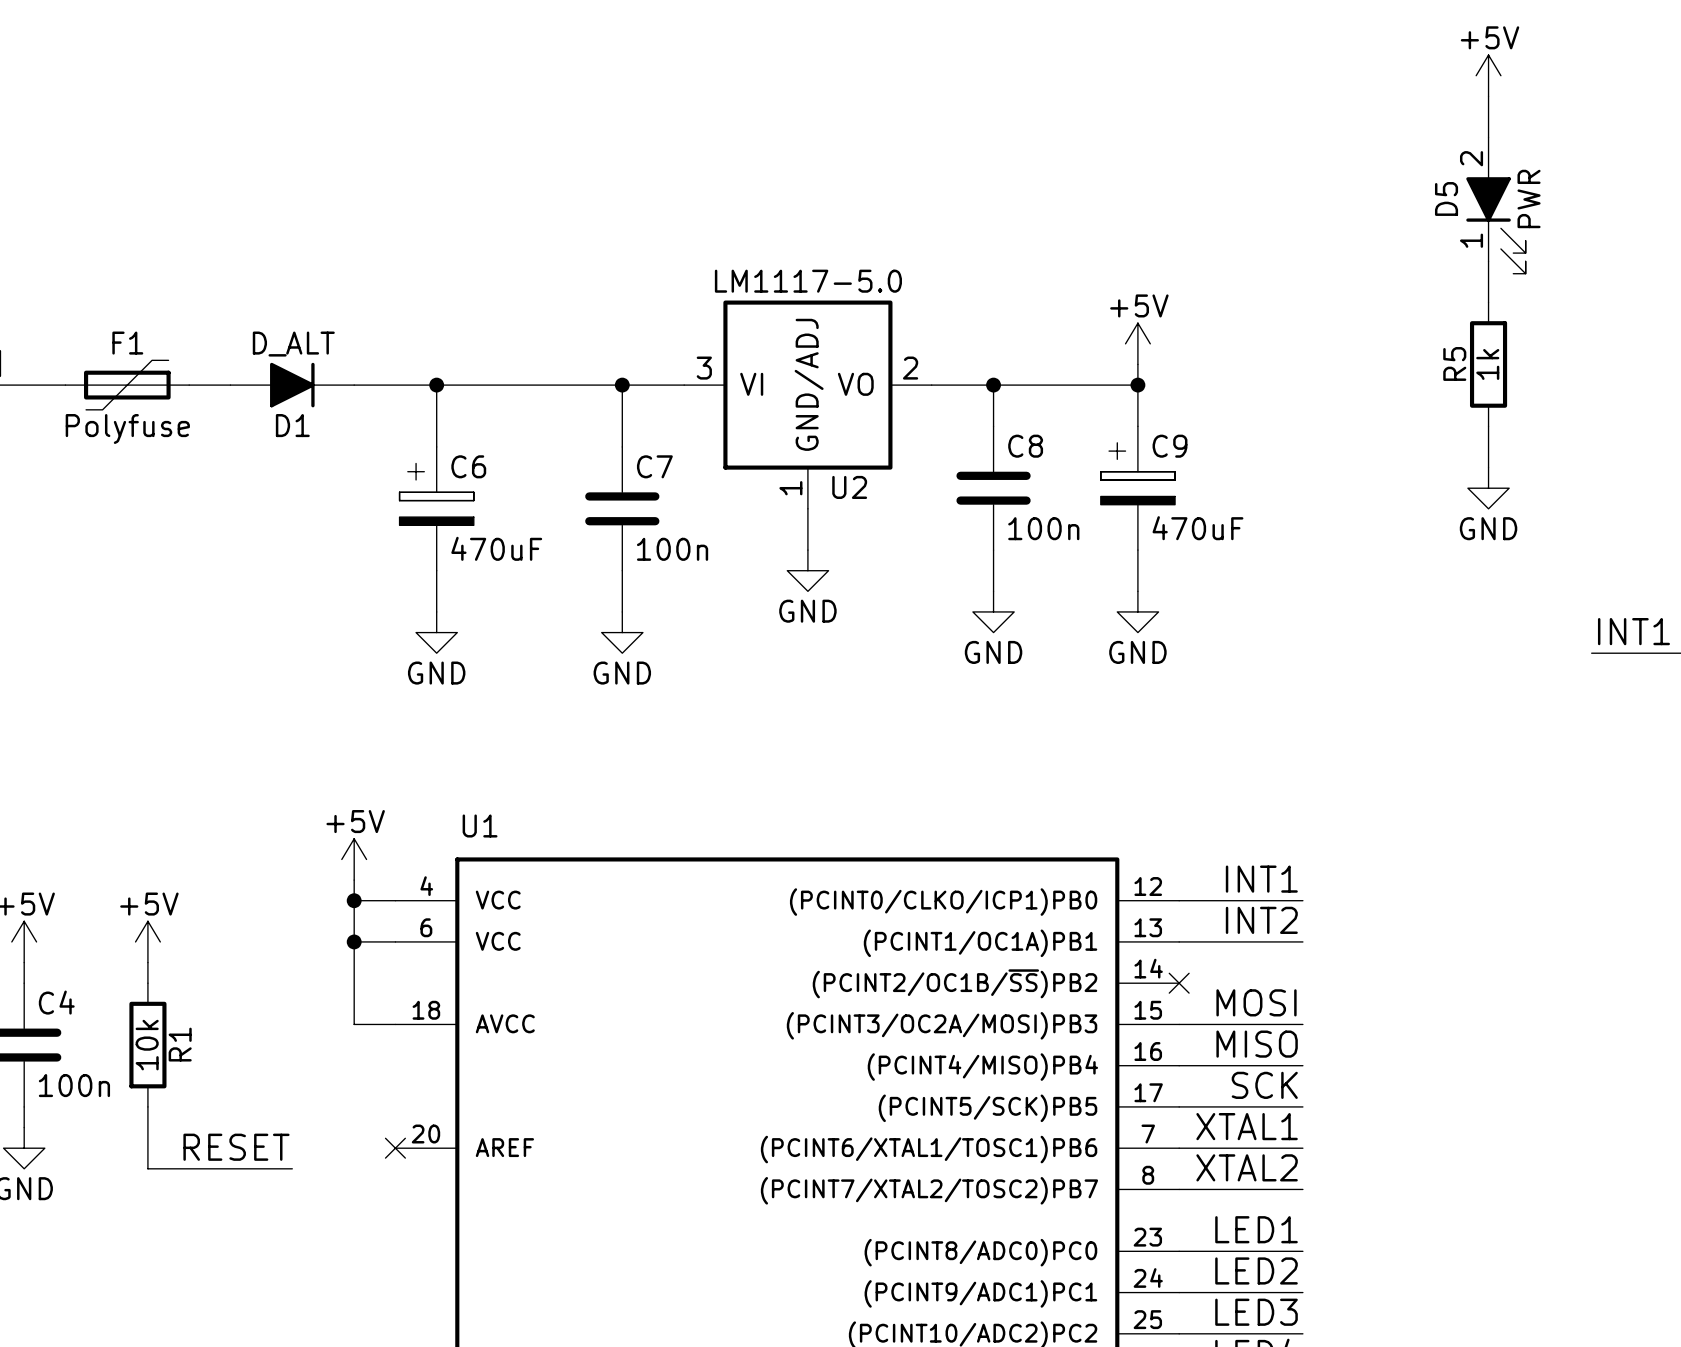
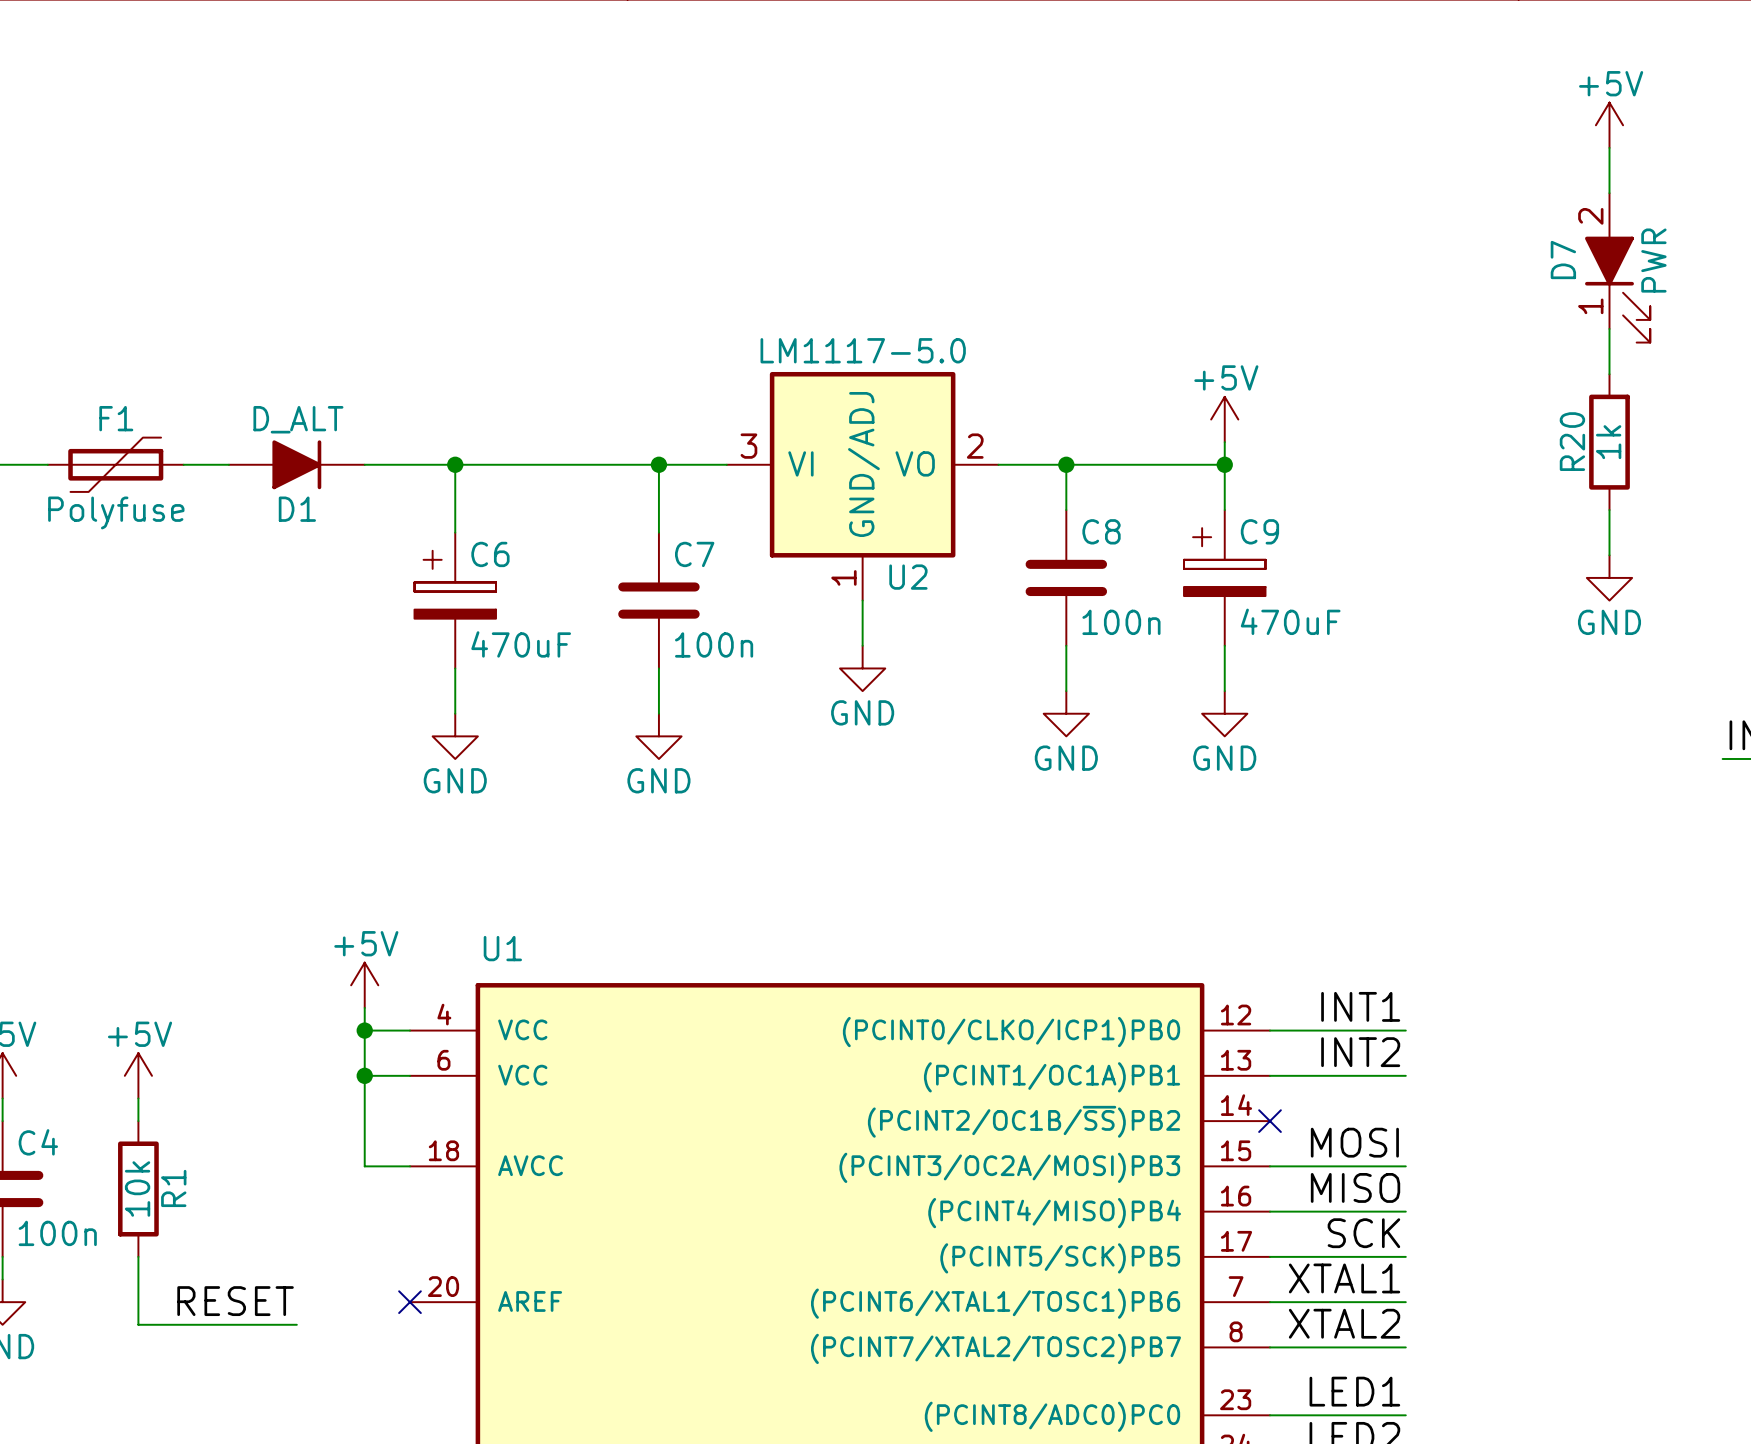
D5 name: D5 (1446, 198) -> D7 (1563, 260)
R5 name: R5 (1454, 363) -> R20 (1572, 441)

